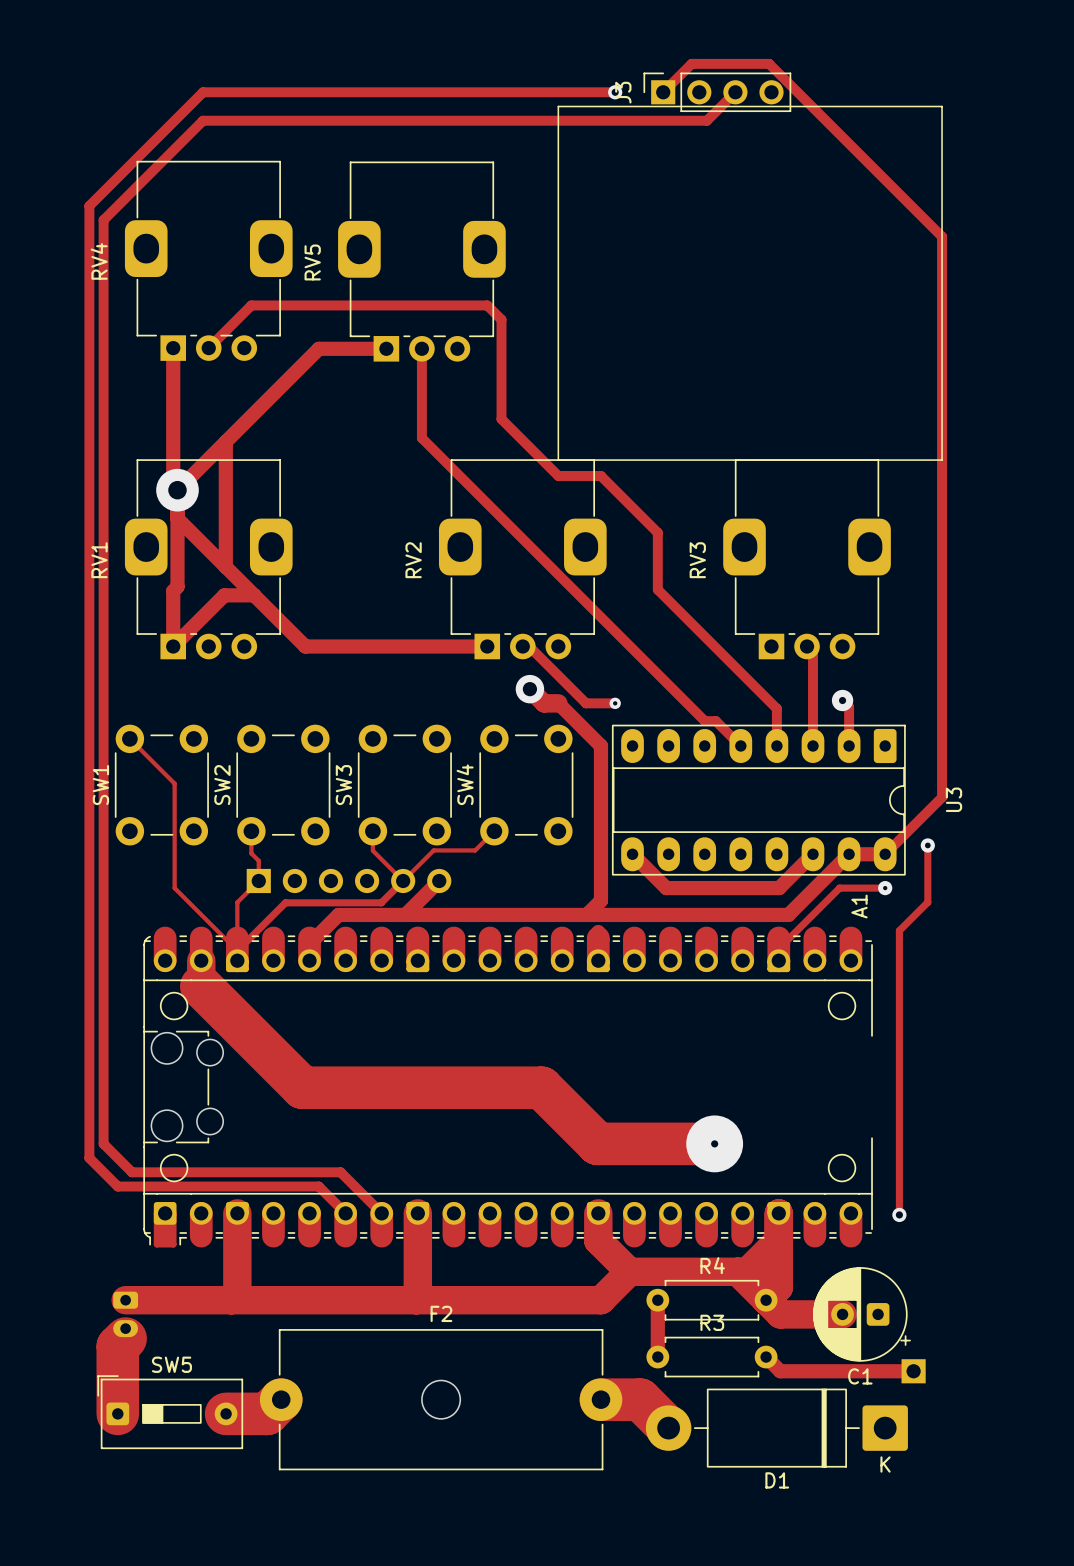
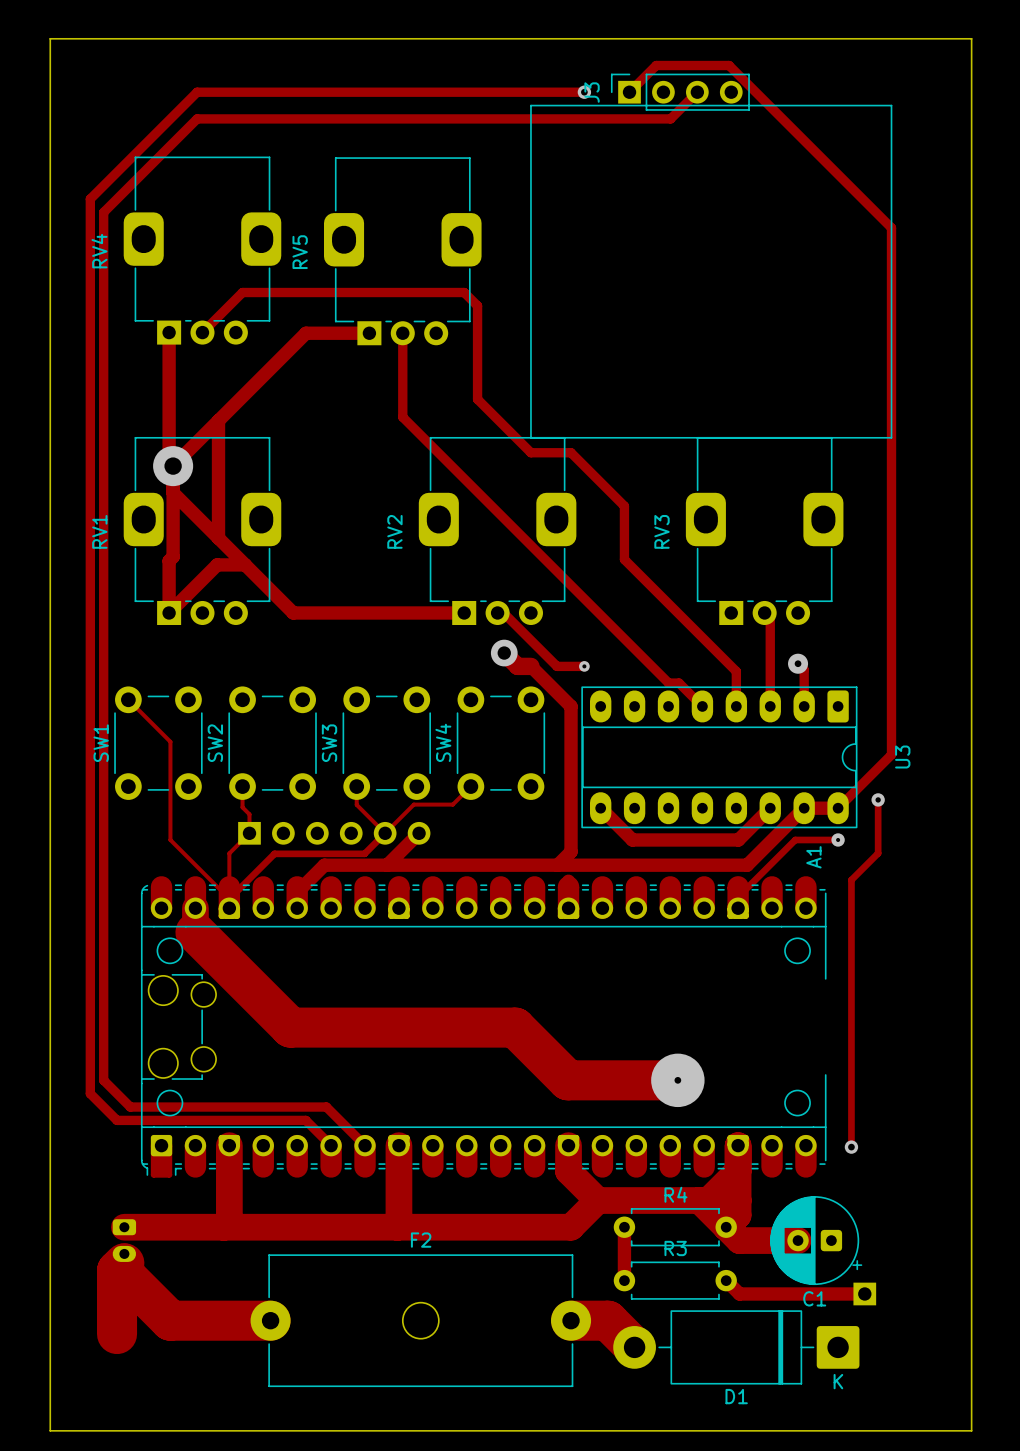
board edge: none -> (50, 38) (971, 38) (971, 1430) (50, 1430) (50, 38)
track: (281, 1399) (267, 1413) (226, 1413) -> (270, 1320) (170, 1320) (124, 1274) (124, 1256)
SW5: (170, 1412) -> none

